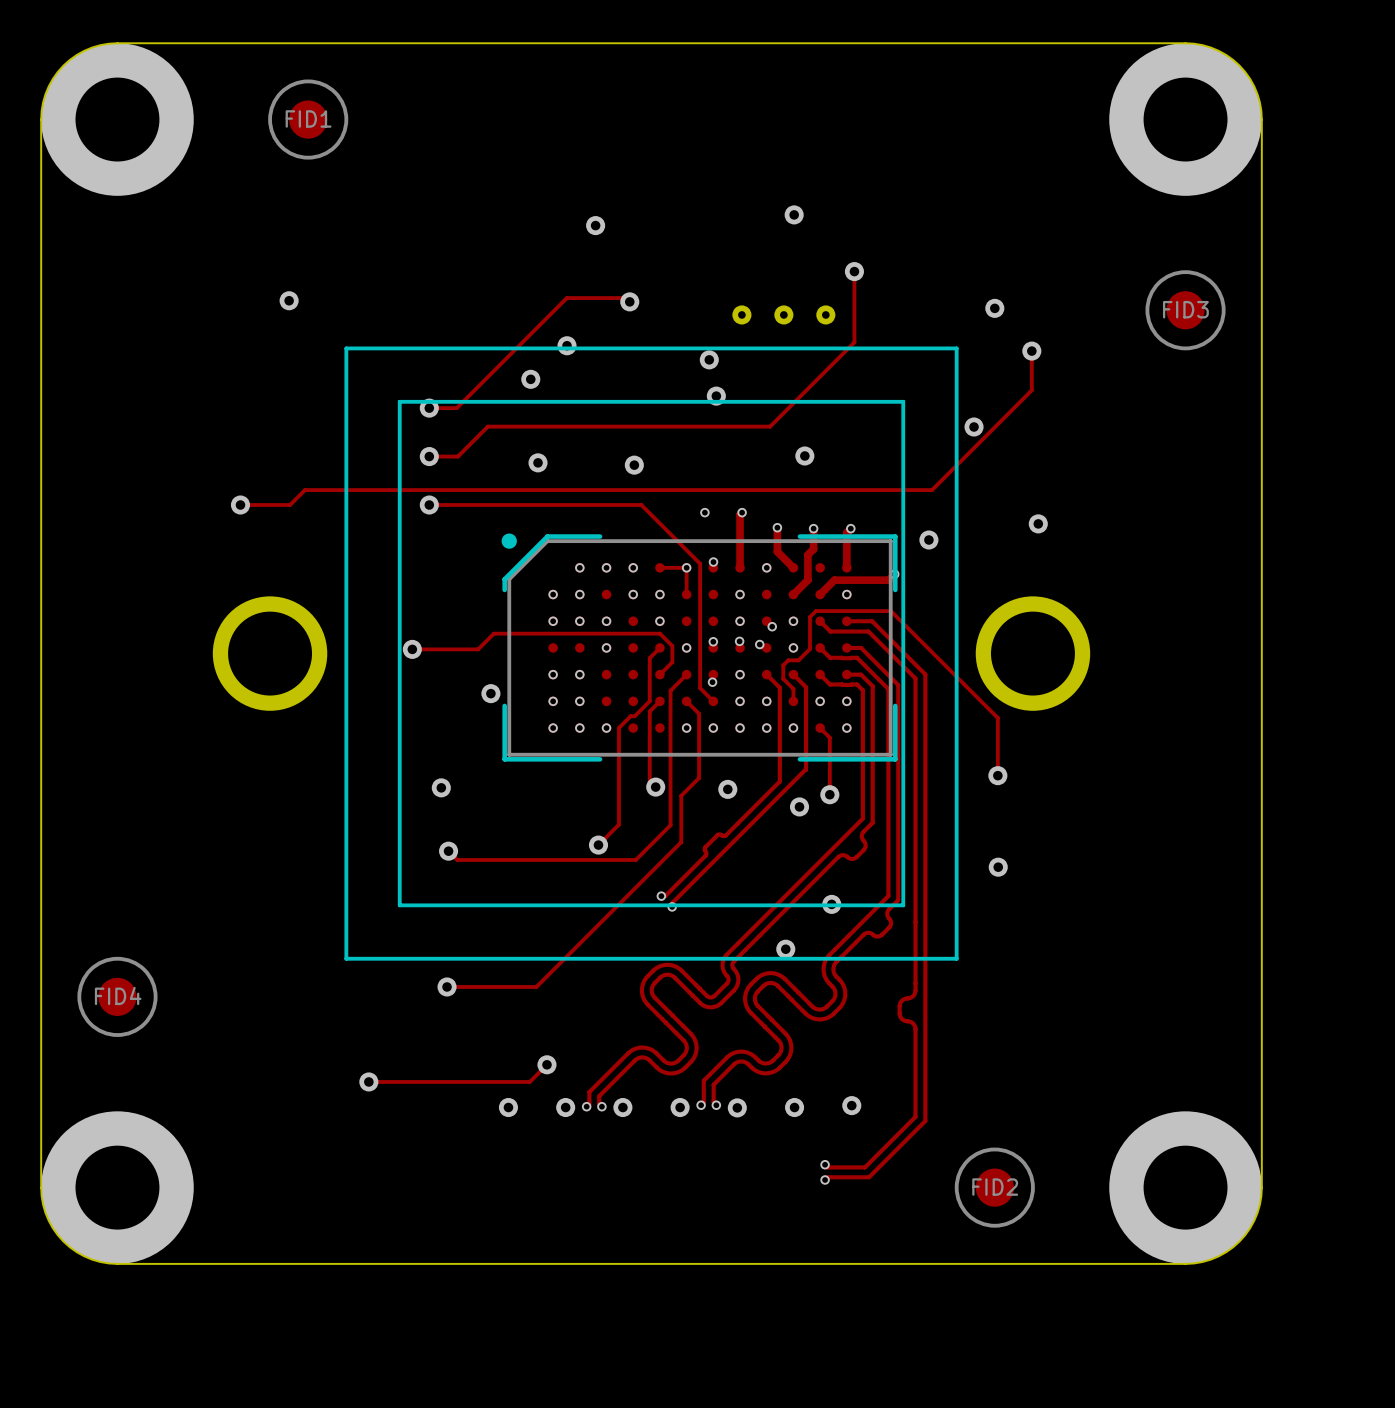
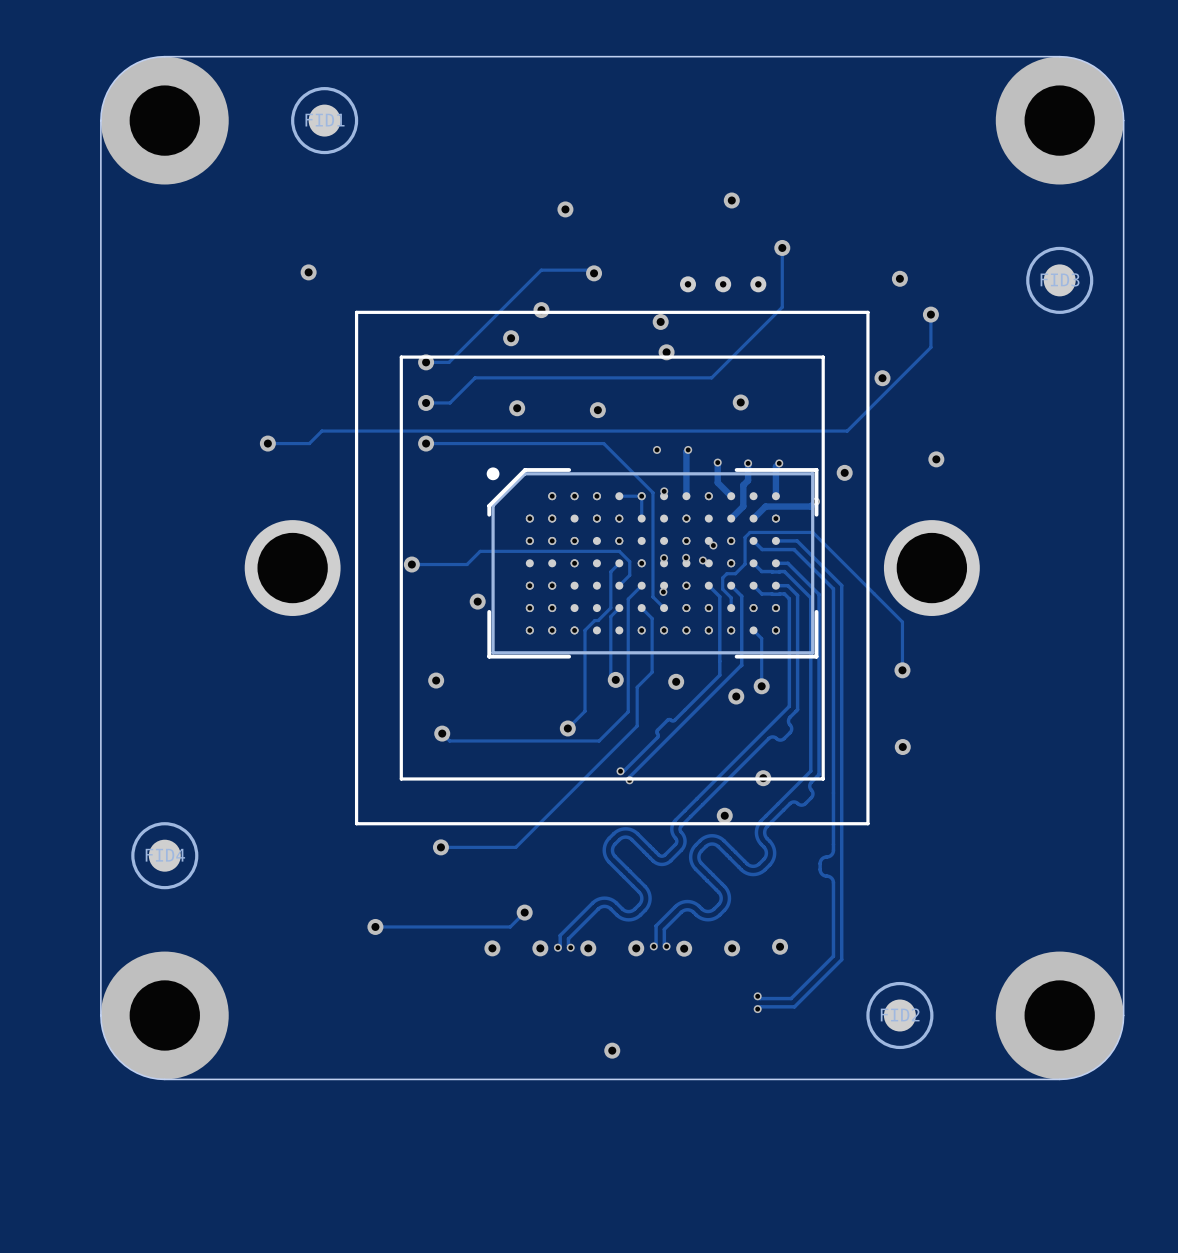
via: none -> (612, 1050)

